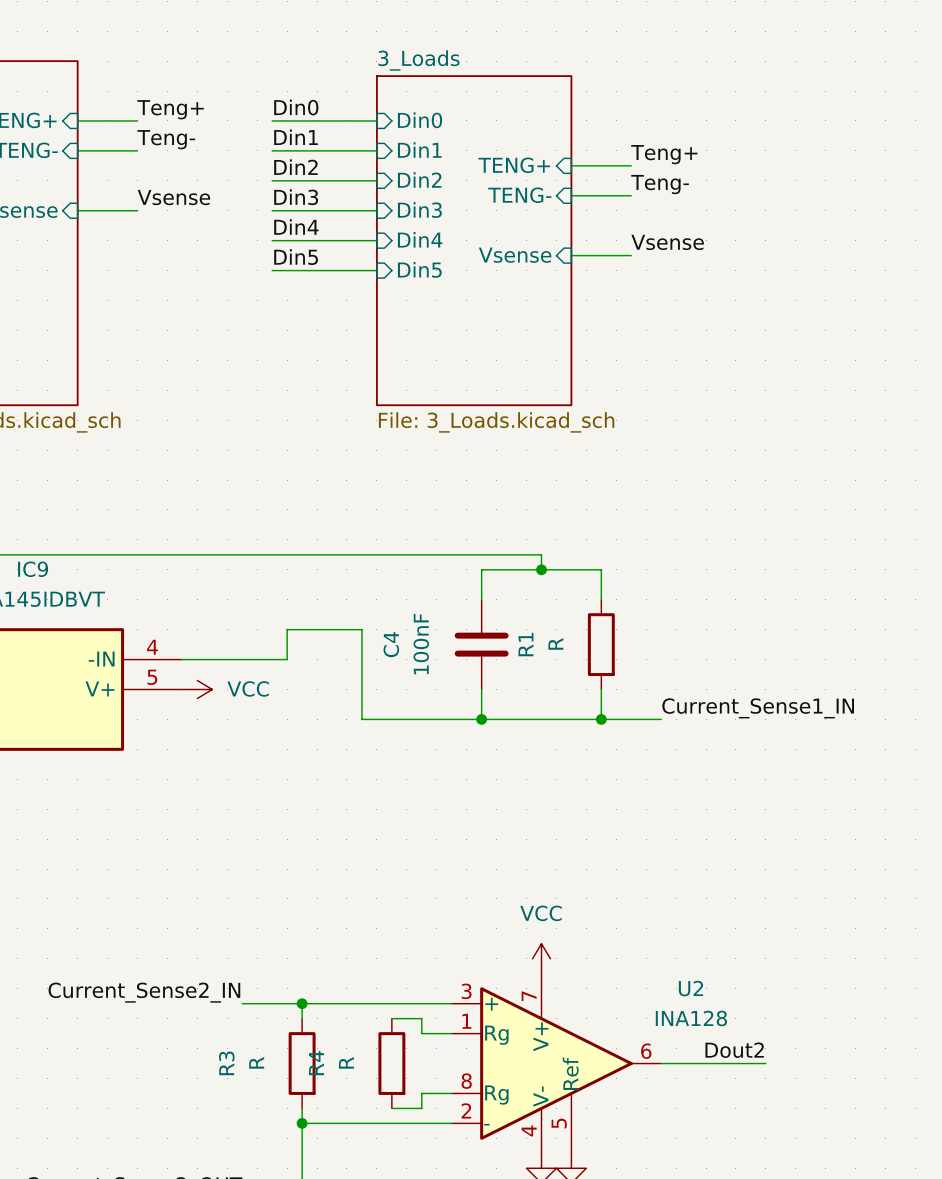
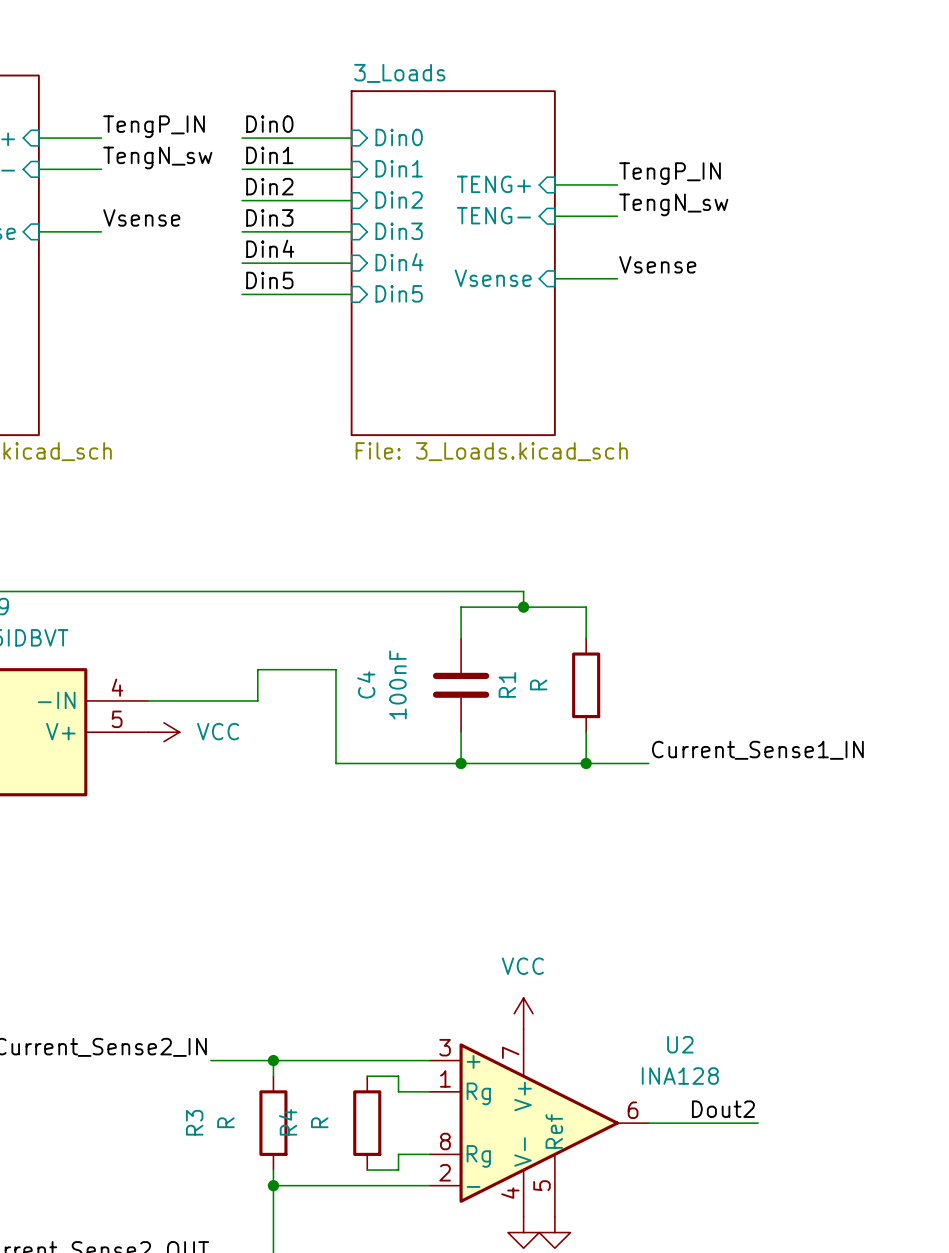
label: Teng+ (170, 109) -> TengP_IN (154, 126)
label: Teng- (166, 139) -> TengN_sw (157, 157)
label: Teng+ (664, 154) -> TengP_IN (670, 173)
label: Teng- (660, 184) -> TengN_sw (673, 204)

